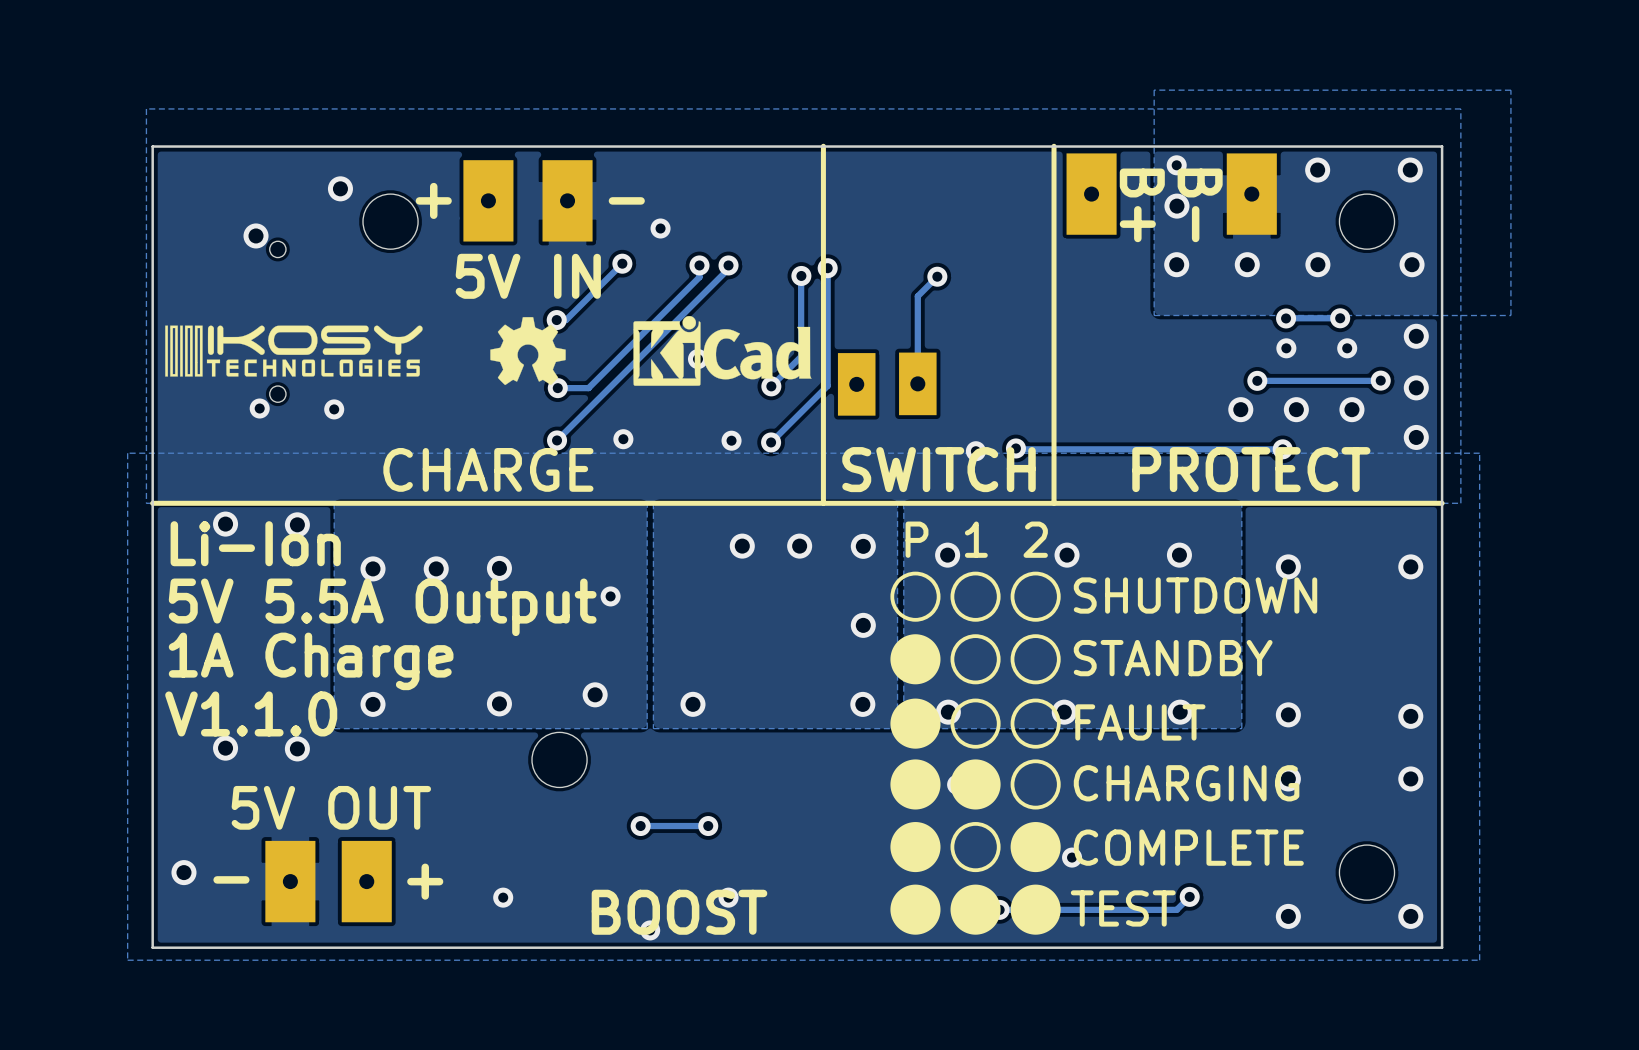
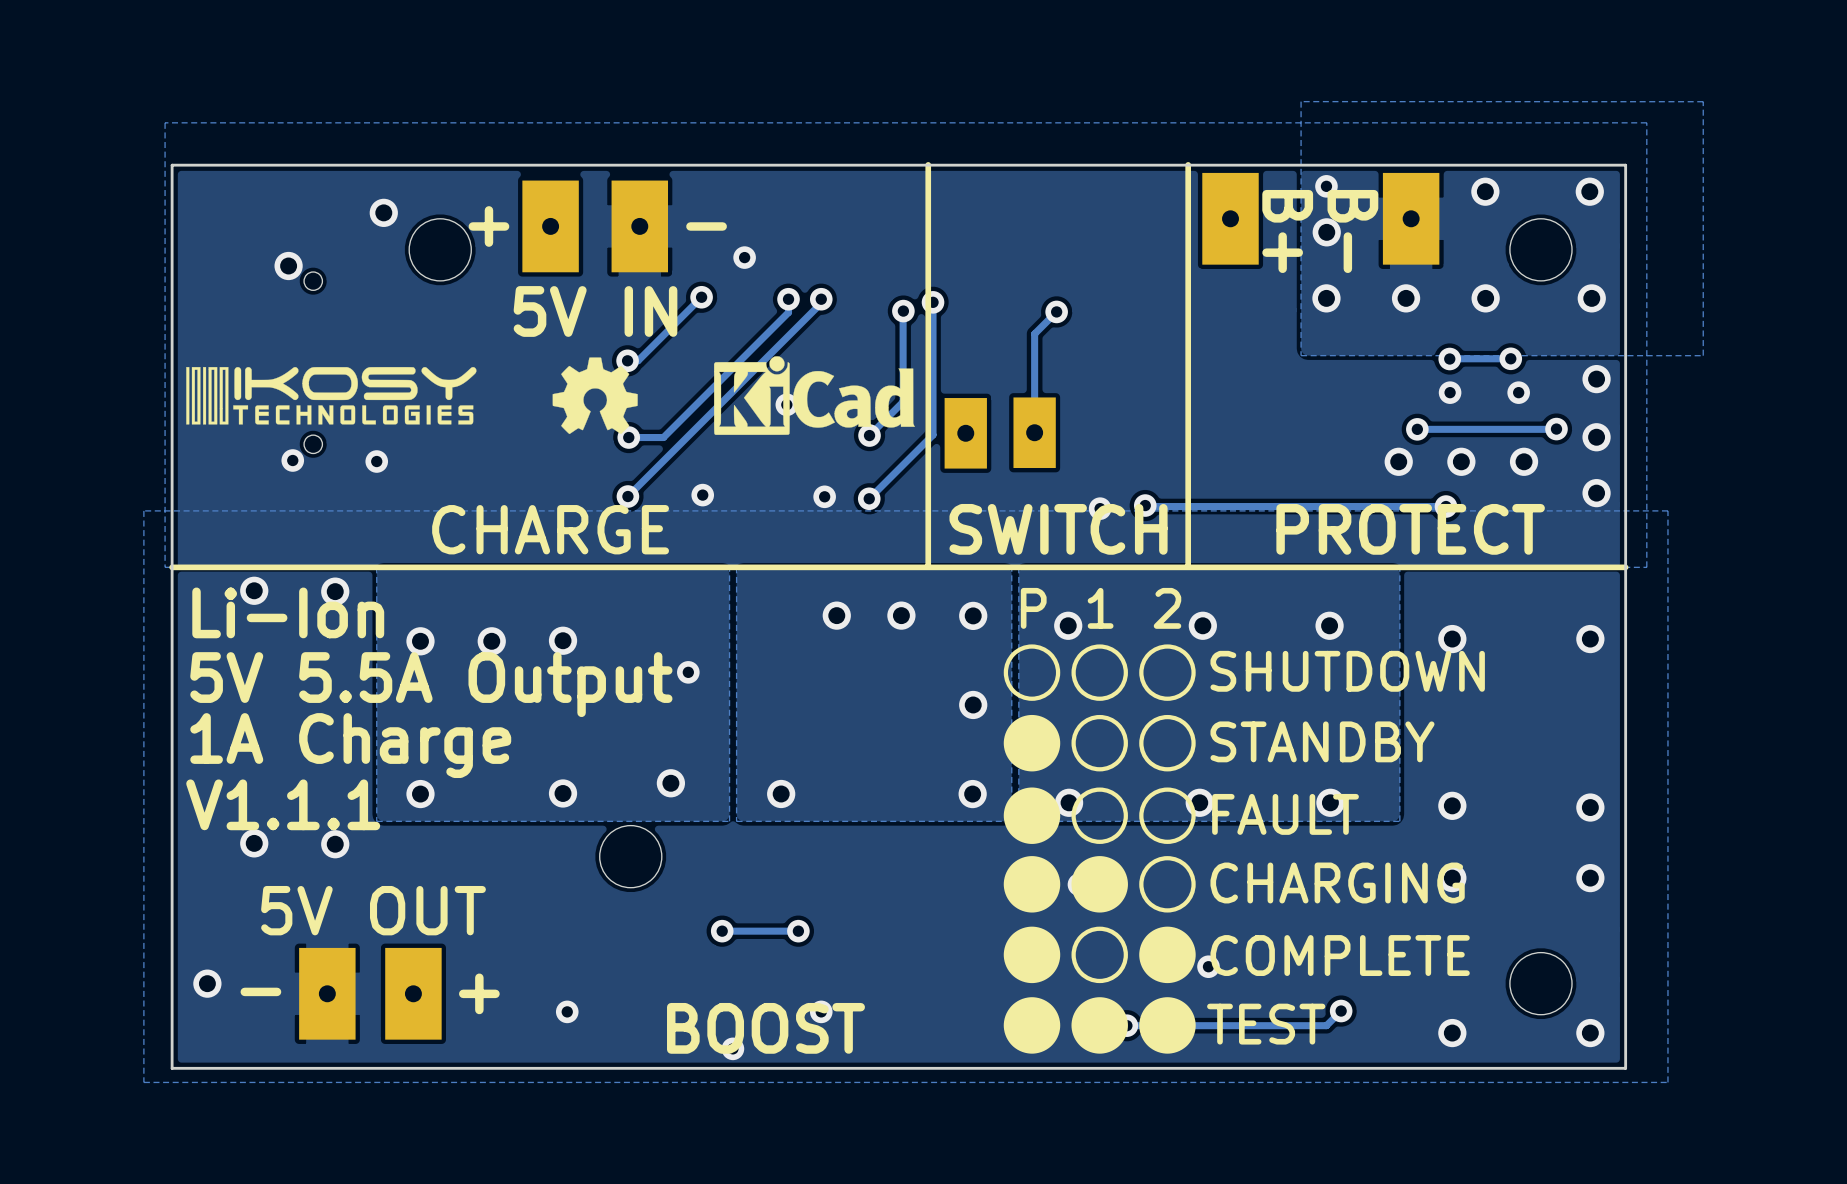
text: V1.1.0 (251, 713) -> V1.1.1 (283, 804)

